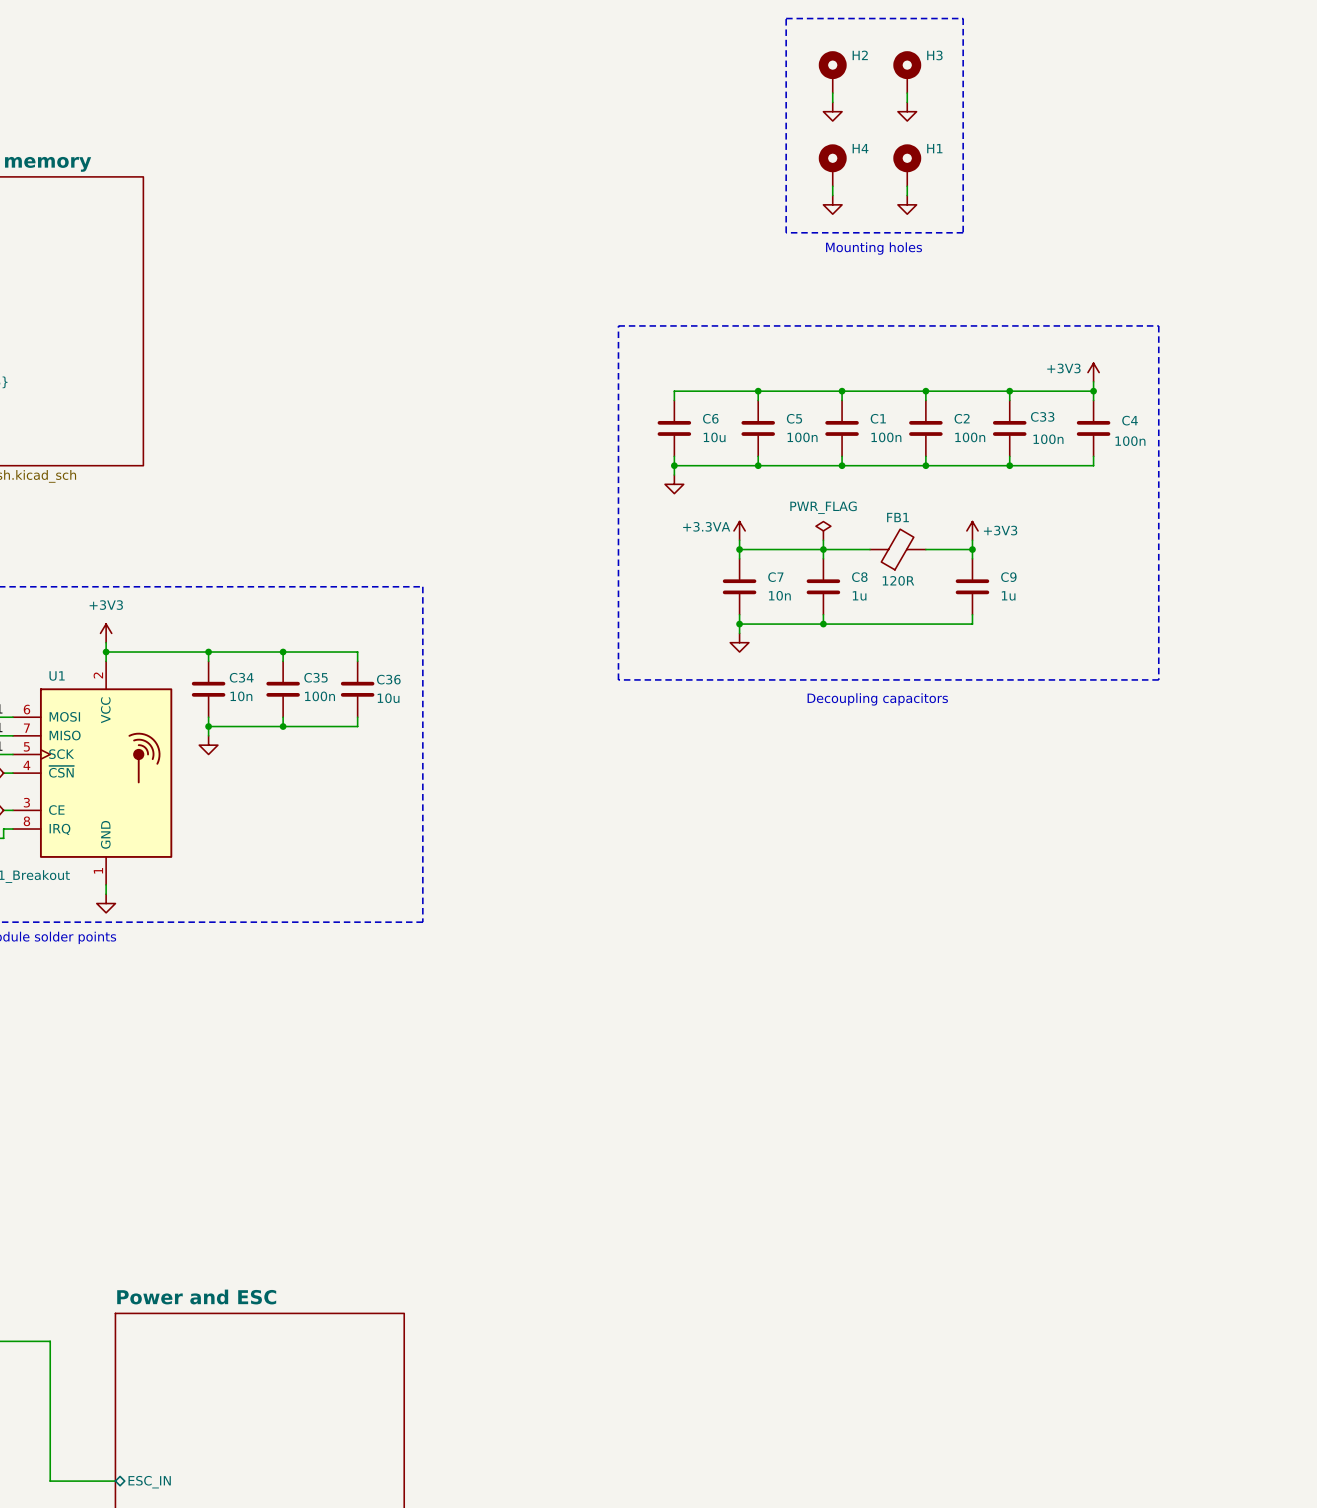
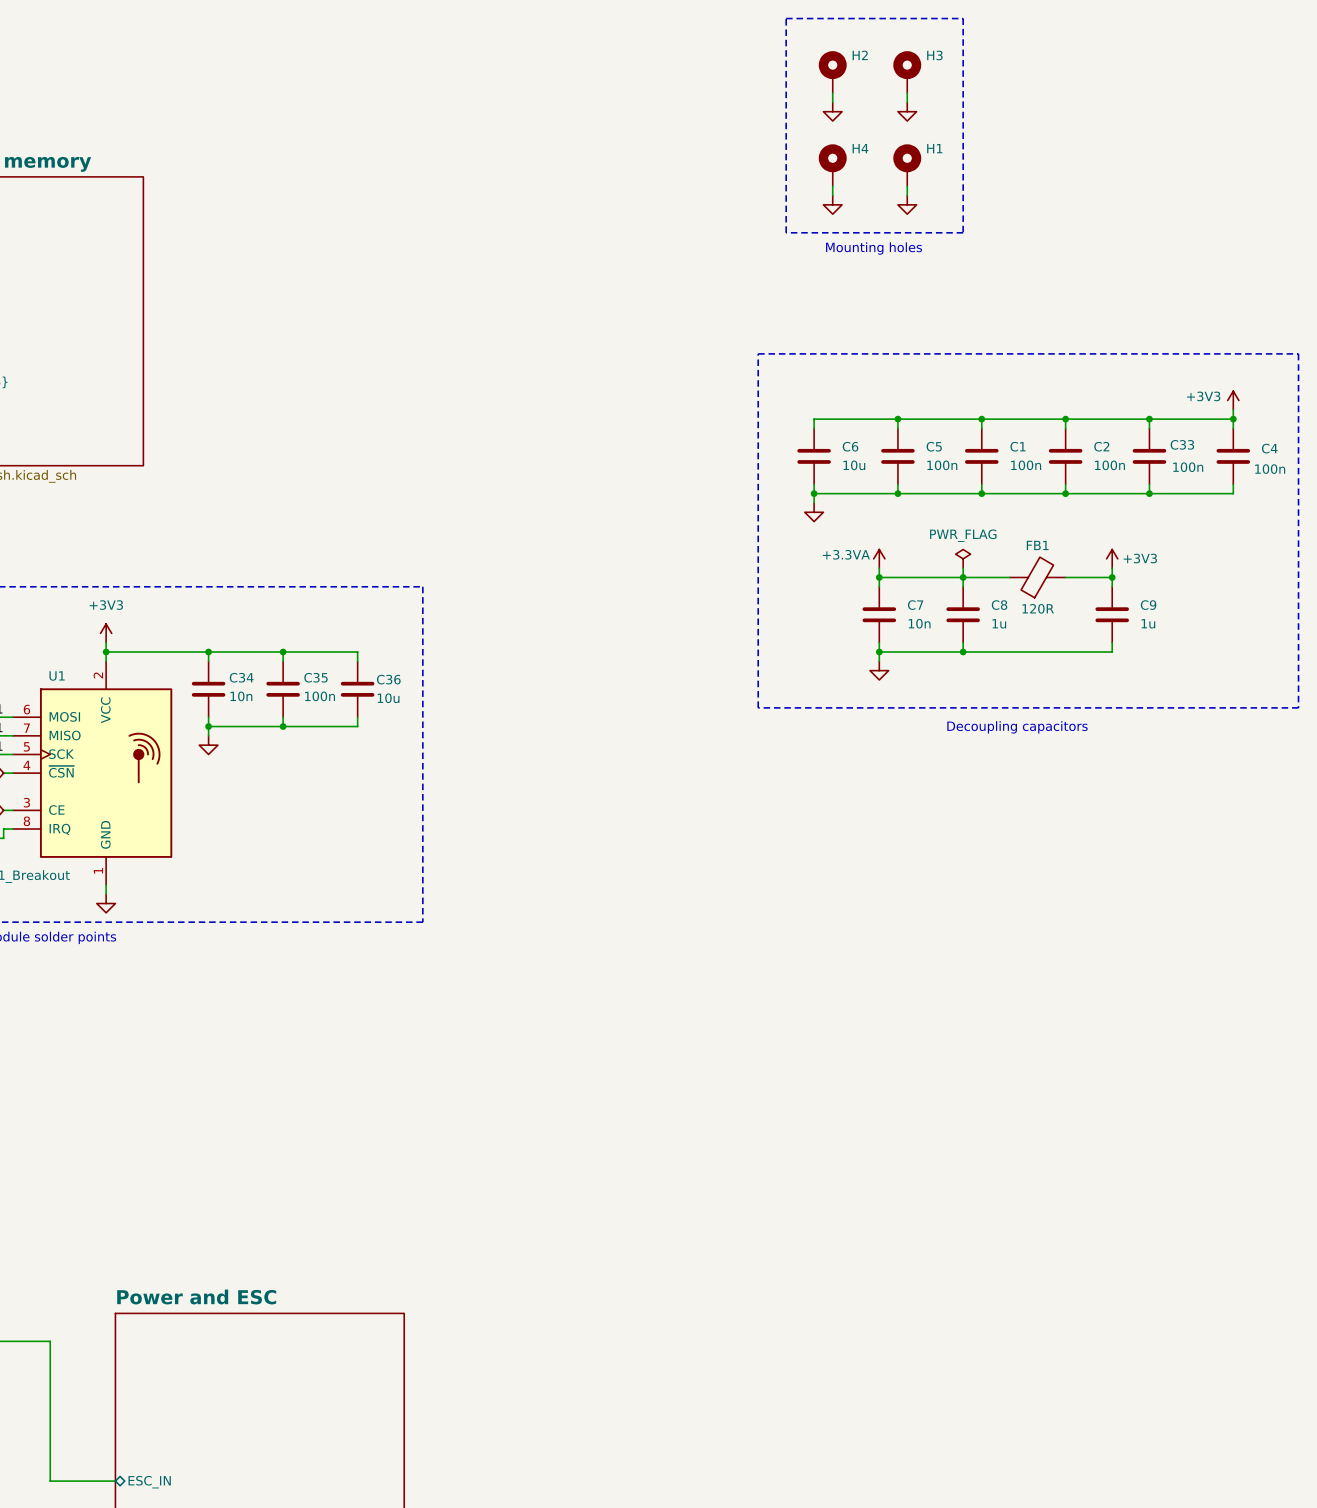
line: (618, 325) (1158, 325) (1158, 679) (618, 679) (618, 325) -> (758, 353) (1298, 353) (1298, 707) (758, 707) (758, 353)
power symbol: +3V3 (1093, 372) -> none
wire: (1093, 381) (1093, 400) -> (1233, 409) (1233, 428)
junction: (758, 391) -> none
wire: (842, 391) (842, 400) -> (981, 419) (981, 428)
junction: (842, 391) -> none
wire: (925, 391) (925, 400) -> (1065, 419) (1065, 428)
junction: (925, 391) -> none
wire: (1009, 391) (1009, 400) -> (1149, 419) (1149, 428)
junction: (1009, 391) -> none
wire: (1093, 391) (674, 391) (674, 400) -> (1233, 419) (814, 419) (814, 428)
junction: (1093, 391) -> none
power symbol: none -> +3V3 (1233, 400)
junction: none -> (897, 419)
junction: none -> (981, 419)
junction: none -> (1065, 419)
junction: none -> (1149, 419)
junction: none -> (1233, 419)
C6 position: (674, 428) -> (814, 456)
C5 position: (758, 428) -> (897, 456)
C1 position: (842, 428) -> (981, 456)
C2 position: (925, 428) -> (1065, 456)
C33 position: (1009, 428) -> (1149, 456)
C4 position: (1093, 428) -> (1233, 456)
wire: (674, 456) (674, 475) -> (814, 484) (814, 502)
wire: (842, 456) (842, 465) -> (981, 484) (981, 493)
wire: (925, 456) (925, 465) -> (1065, 484) (1065, 493)
wire: (1009, 456) (1009, 465) -> (1149, 484) (1149, 493)
wire: (1093, 456) (1093, 465) (674, 465) -> (1233, 484) (1233, 493) (814, 493)
junction: (674, 465) -> none
junction: (758, 465) -> none
junction: (842, 465) -> none
junction: (925, 465) -> none
junction: (1009, 465) -> none
power symbol: (674, 484) -> none
junction: none -> (814, 493)
junction: none -> (897, 493)
junction: none -> (981, 493)
junction: none -> (1065, 493)
junction: none -> (1149, 493)
power symbol: none -> (814, 512)
power symbol position: +3.3VA (739, 530) -> +3.3VA (879, 558)
power symbol position: PWR_FLAG (823, 530) -> PWR_FLAG (963, 558)
power symbol: +3V3 (972, 530) -> none
wire: (739, 540) (739, 558) -> (879, 568) (879, 586)
wire: (823, 540) (823, 558) -> (963, 568) (963, 586)
wire: (972, 540) (972, 558) -> (1112, 568) (1112, 586)
wire: (739, 549) (869, 549) -> (879, 577) (1009, 577)
junction: (739, 549) -> none
junction: (823, 549) -> none
FB1 position: (897, 549) -> (1037, 577)
wire: (925, 549) (972, 549) -> (1065, 577) (1112, 577)
junction: (972, 549) -> none
power symbol: none -> +3V3 (1112, 558)
junction: none -> (879, 577)
junction: none -> (963, 577)
junction: none -> (1112, 577)
C7 position: (739, 586) -> (879, 614)
C8 position: (823, 586) -> (963, 614)
C9 position: (972, 586) -> (1112, 614)
wire: (739, 614) (739, 633) -> (879, 642) (879, 661)
wire: (823, 614) (823, 624) -> (963, 642) (963, 652)
wire: (972, 614) (972, 624) (739, 624) -> (1112, 642) (1112, 652) (879, 652)
junction: (739, 624) -> none
junction: (823, 624) -> none
power symbol: (739, 642) -> none
junction: none -> (879, 652)
junction: none -> (963, 652)
power symbol: none -> (879, 670)
text position: Decoupling capacitors (877, 699) -> Decoupling capacitors (1017, 727)

